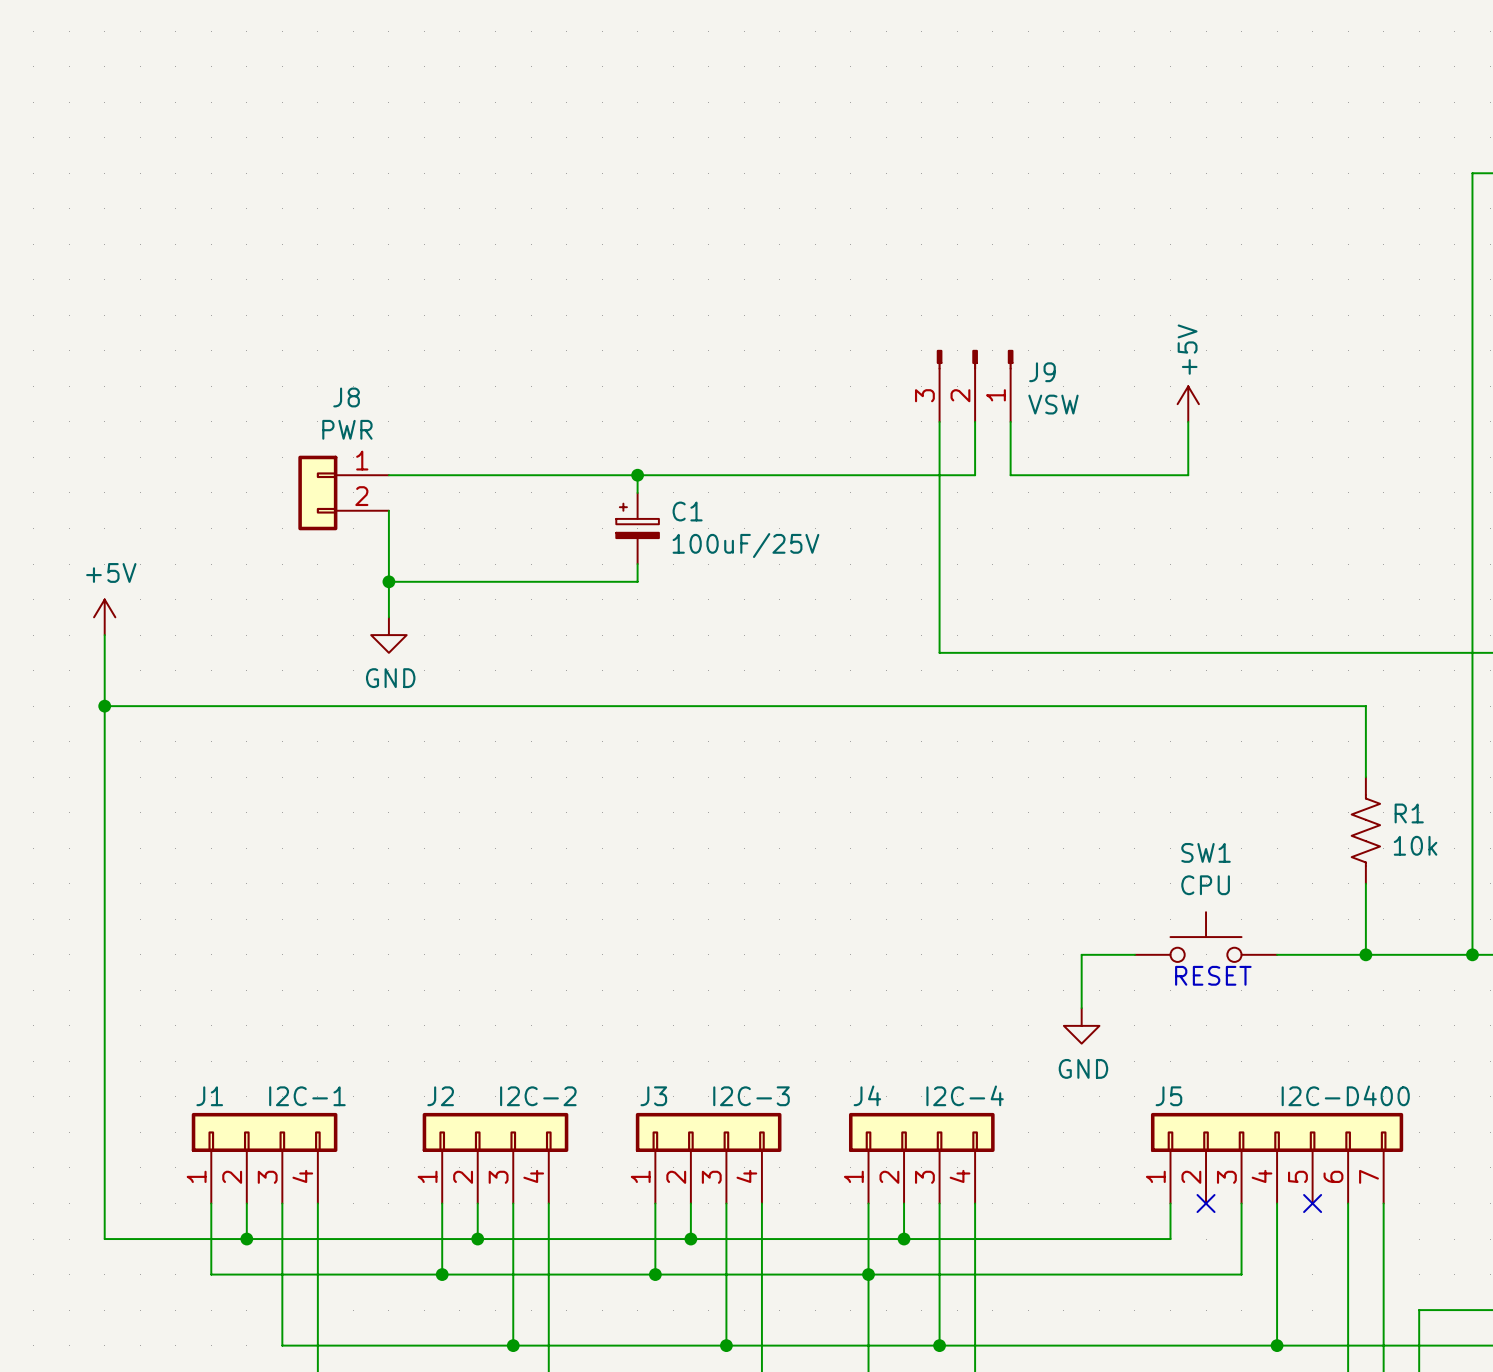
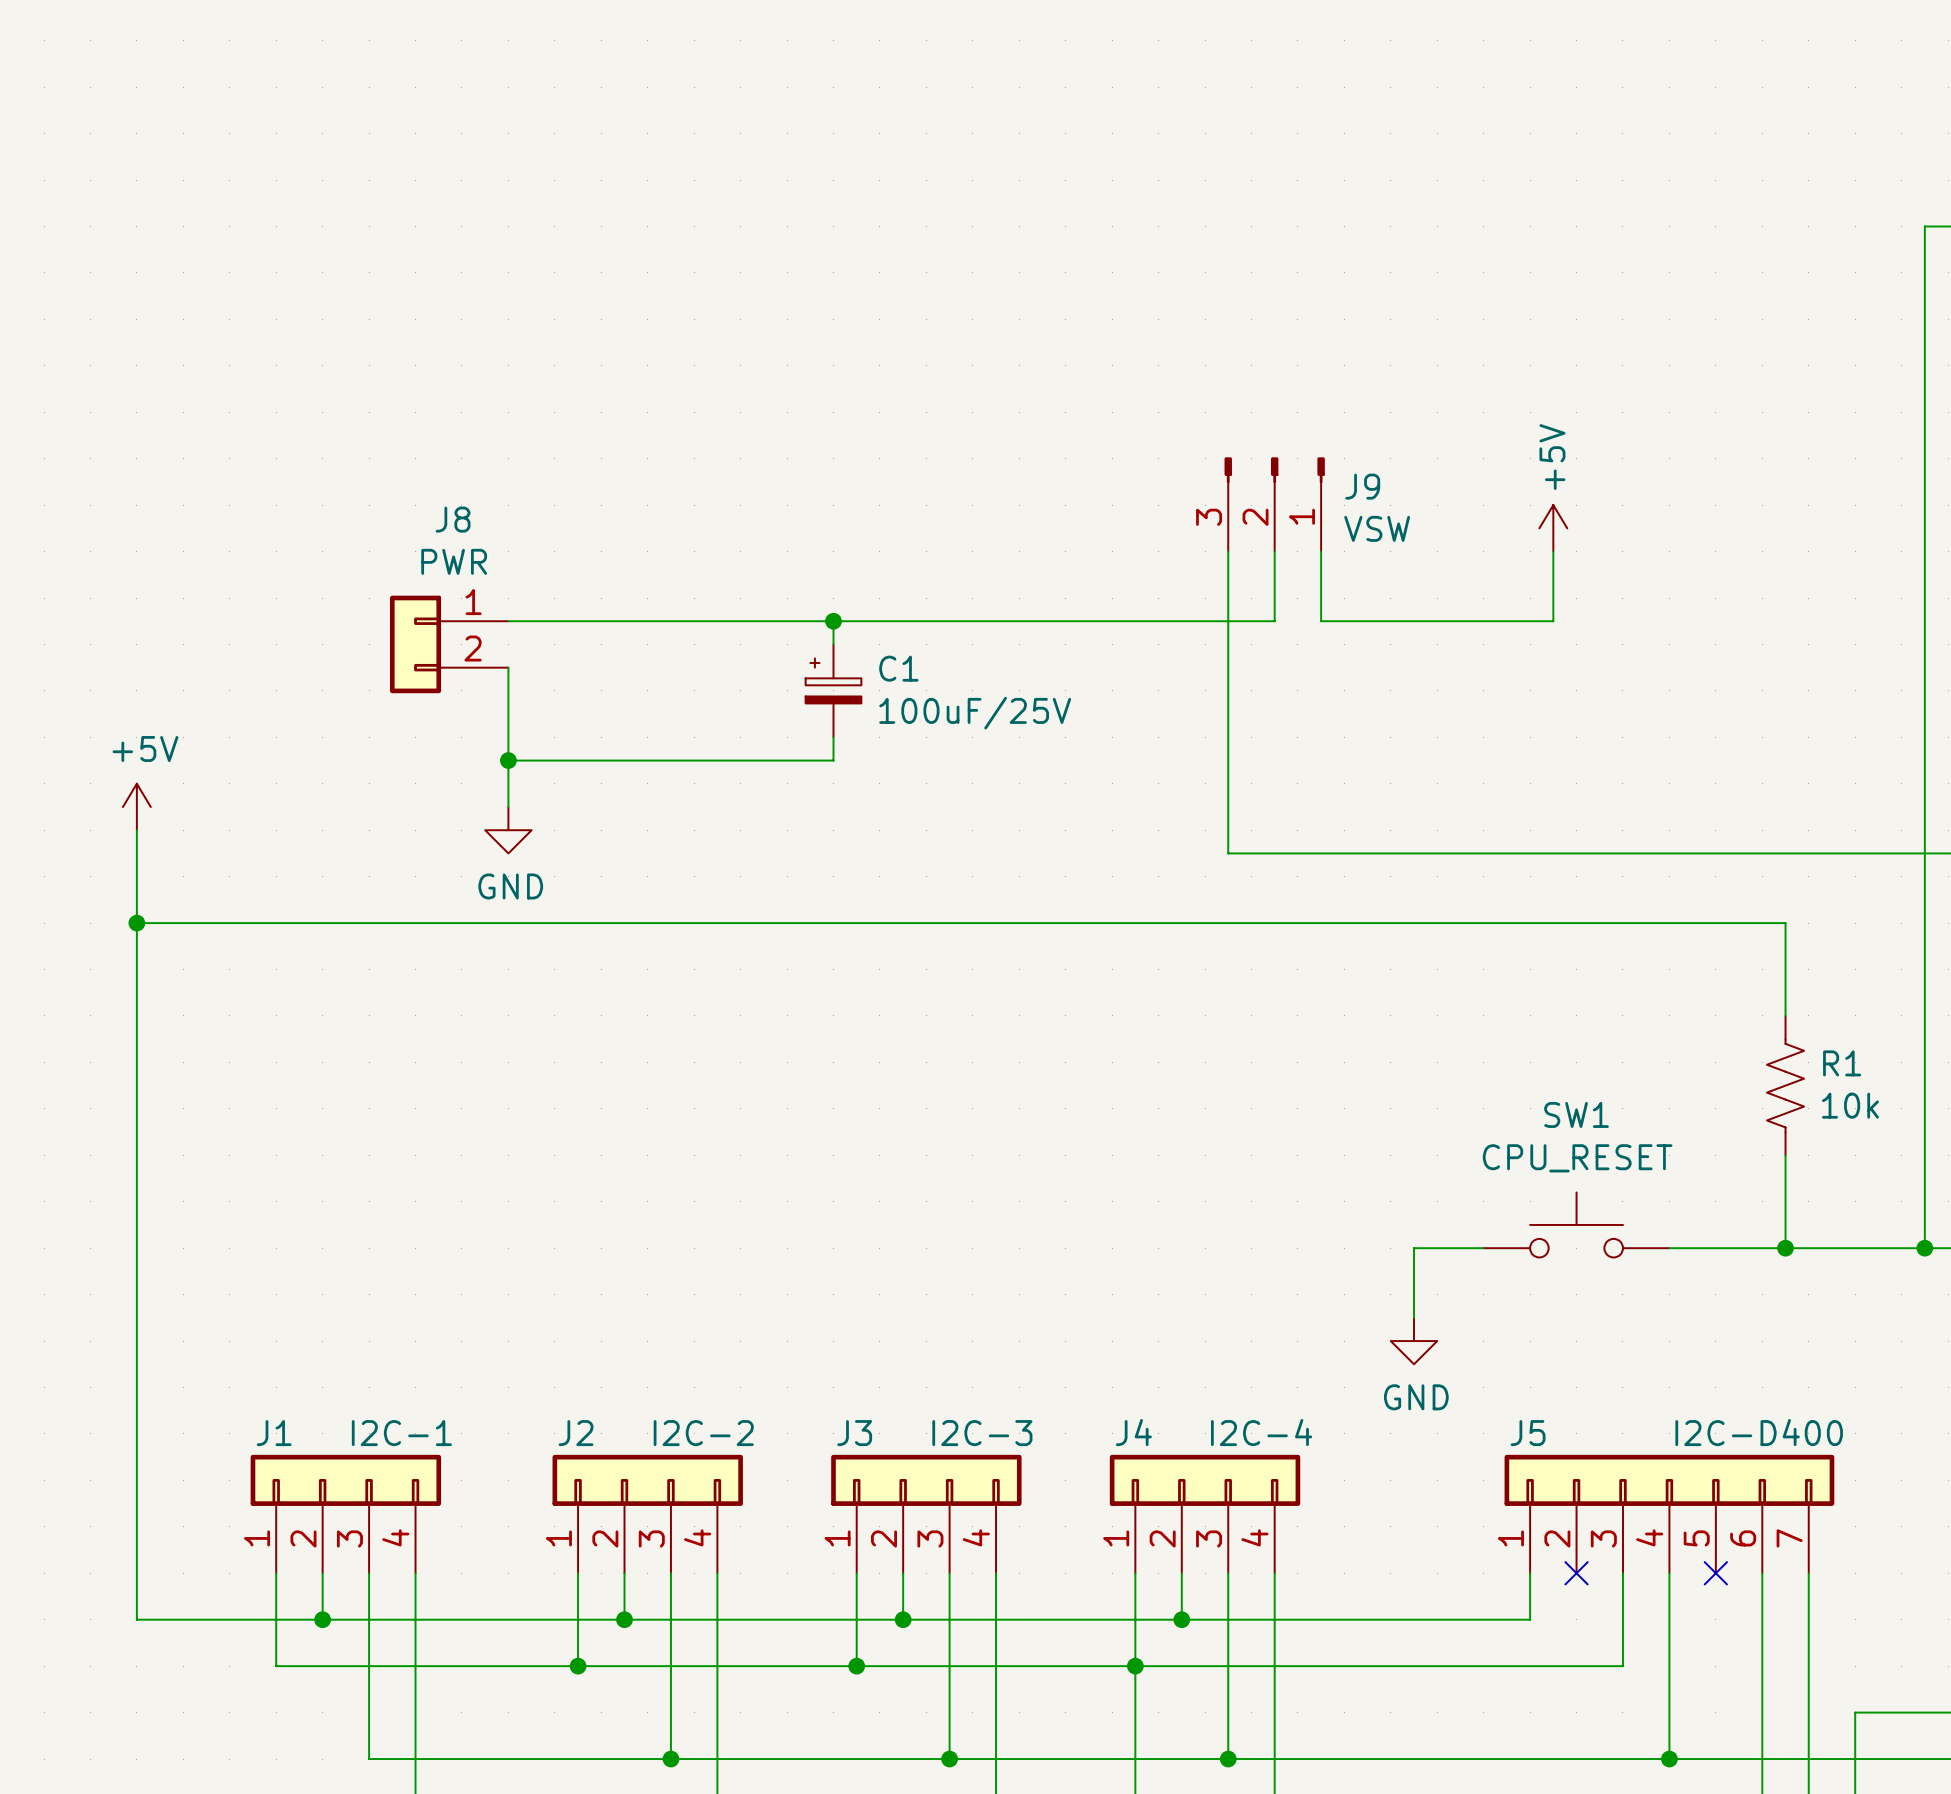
SW1 value: CPU (1205, 885) -> CPU_RESET (1577, 1158)
text: RESET (1213, 975) -> none

